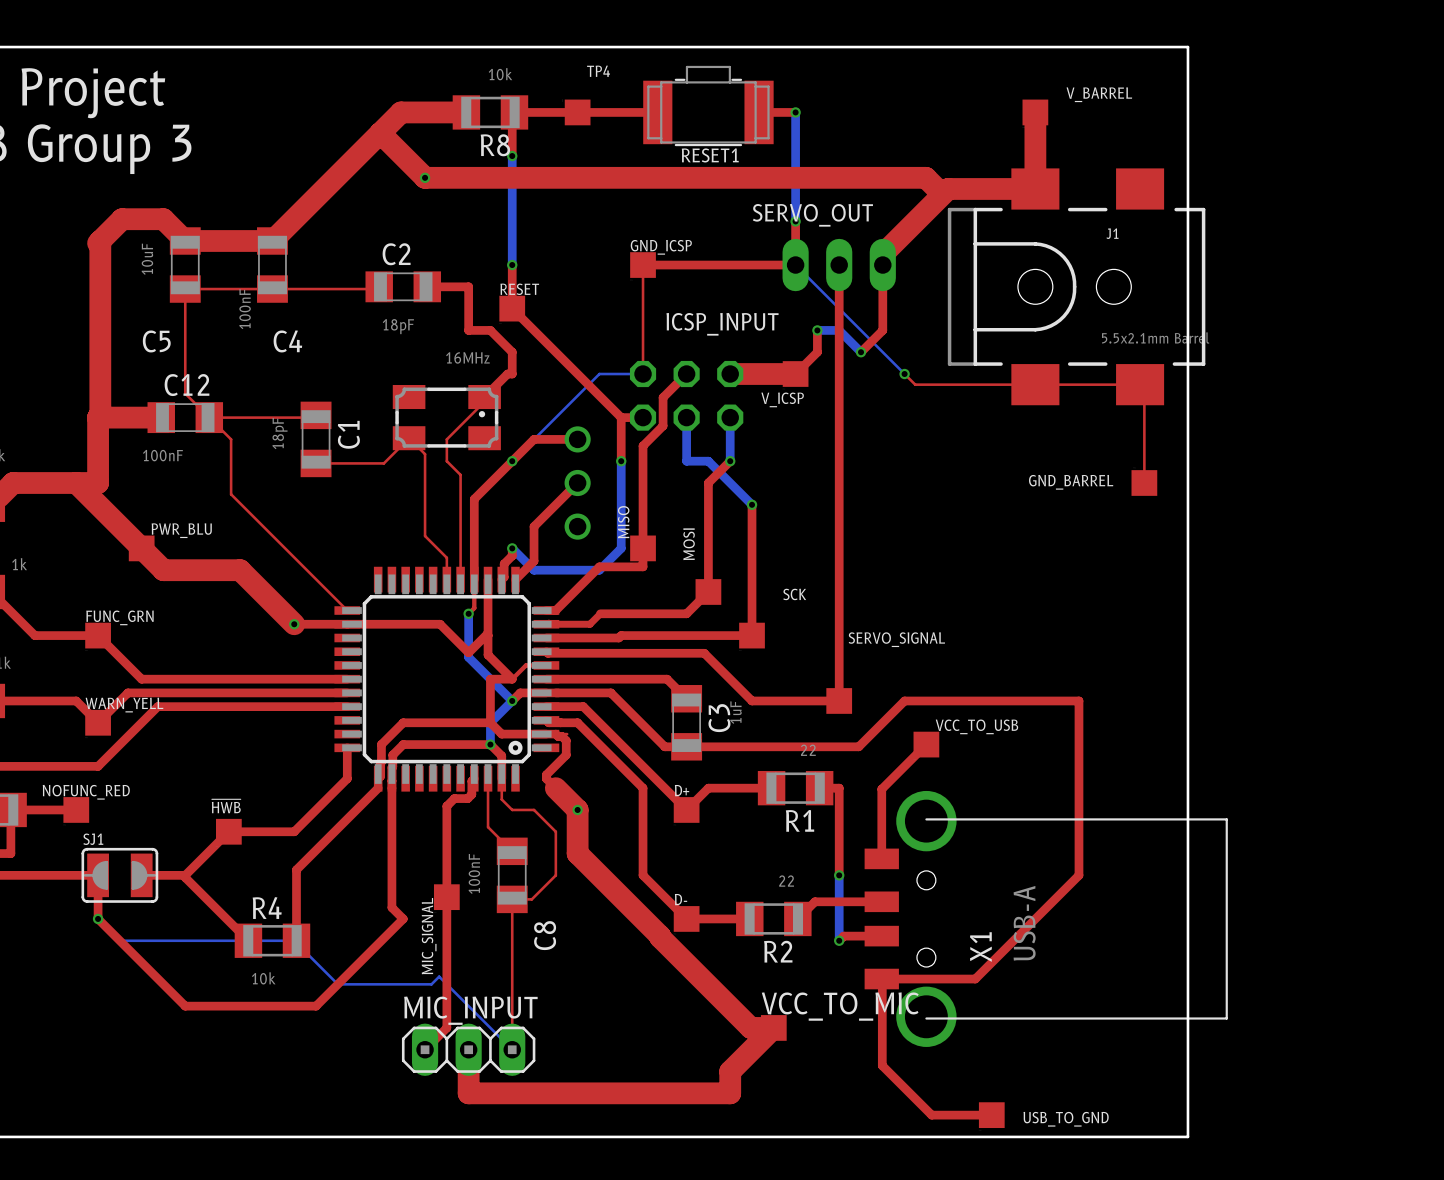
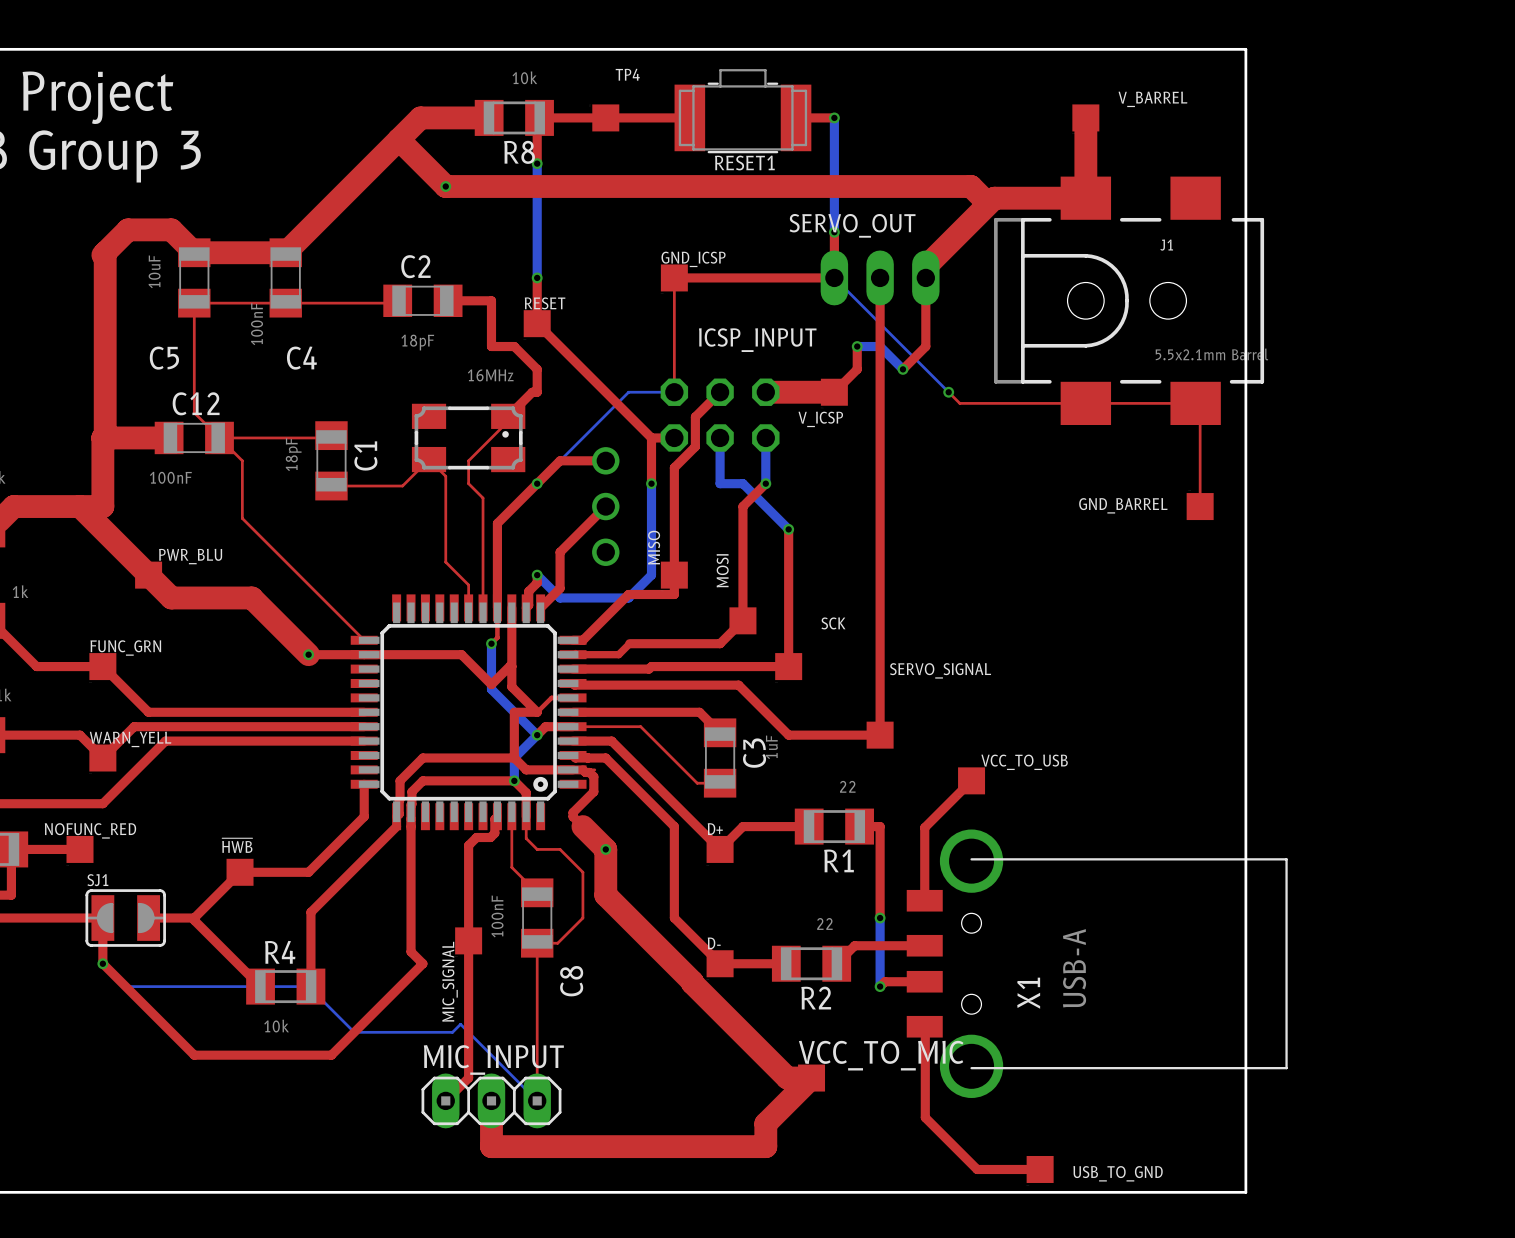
top track width: thick (555, 692) (610, 692) (664, 746) (686, 746) -> thin (582, 726) (640, 726) (697, 783) (720, 783)
top track: (686, 746) (858, 746) (904, 700) (1078, 700) (1078, 875) (975, 979) (881, 979) -> none

